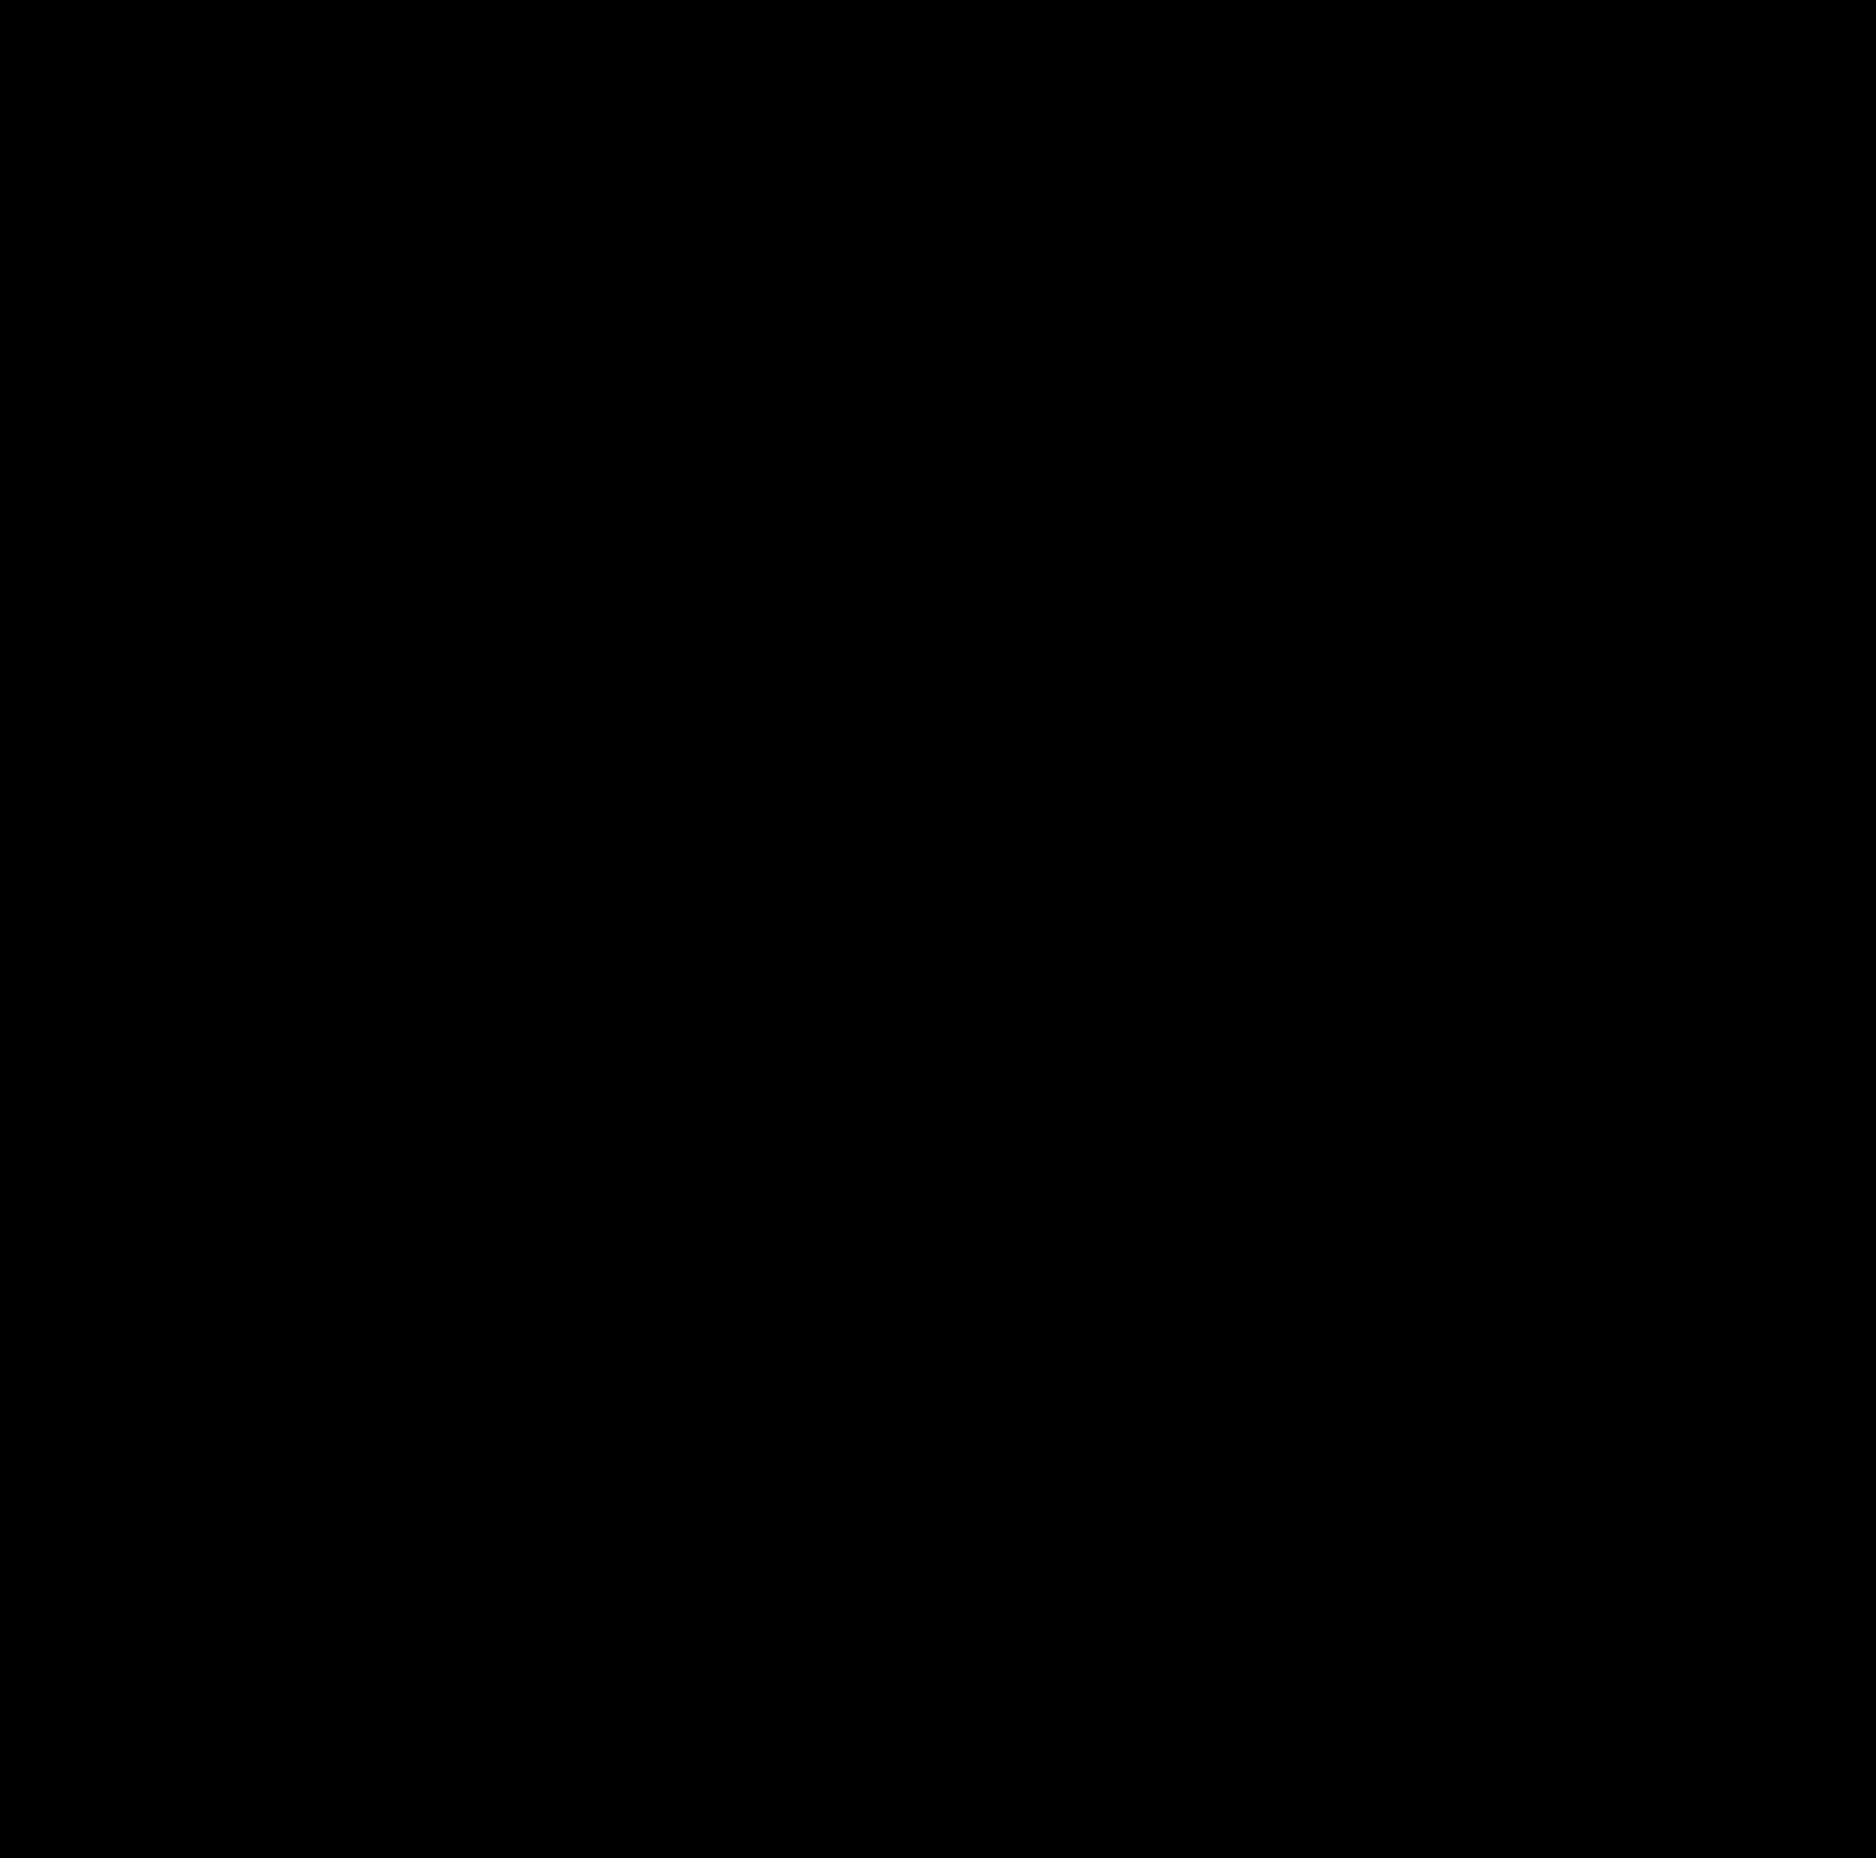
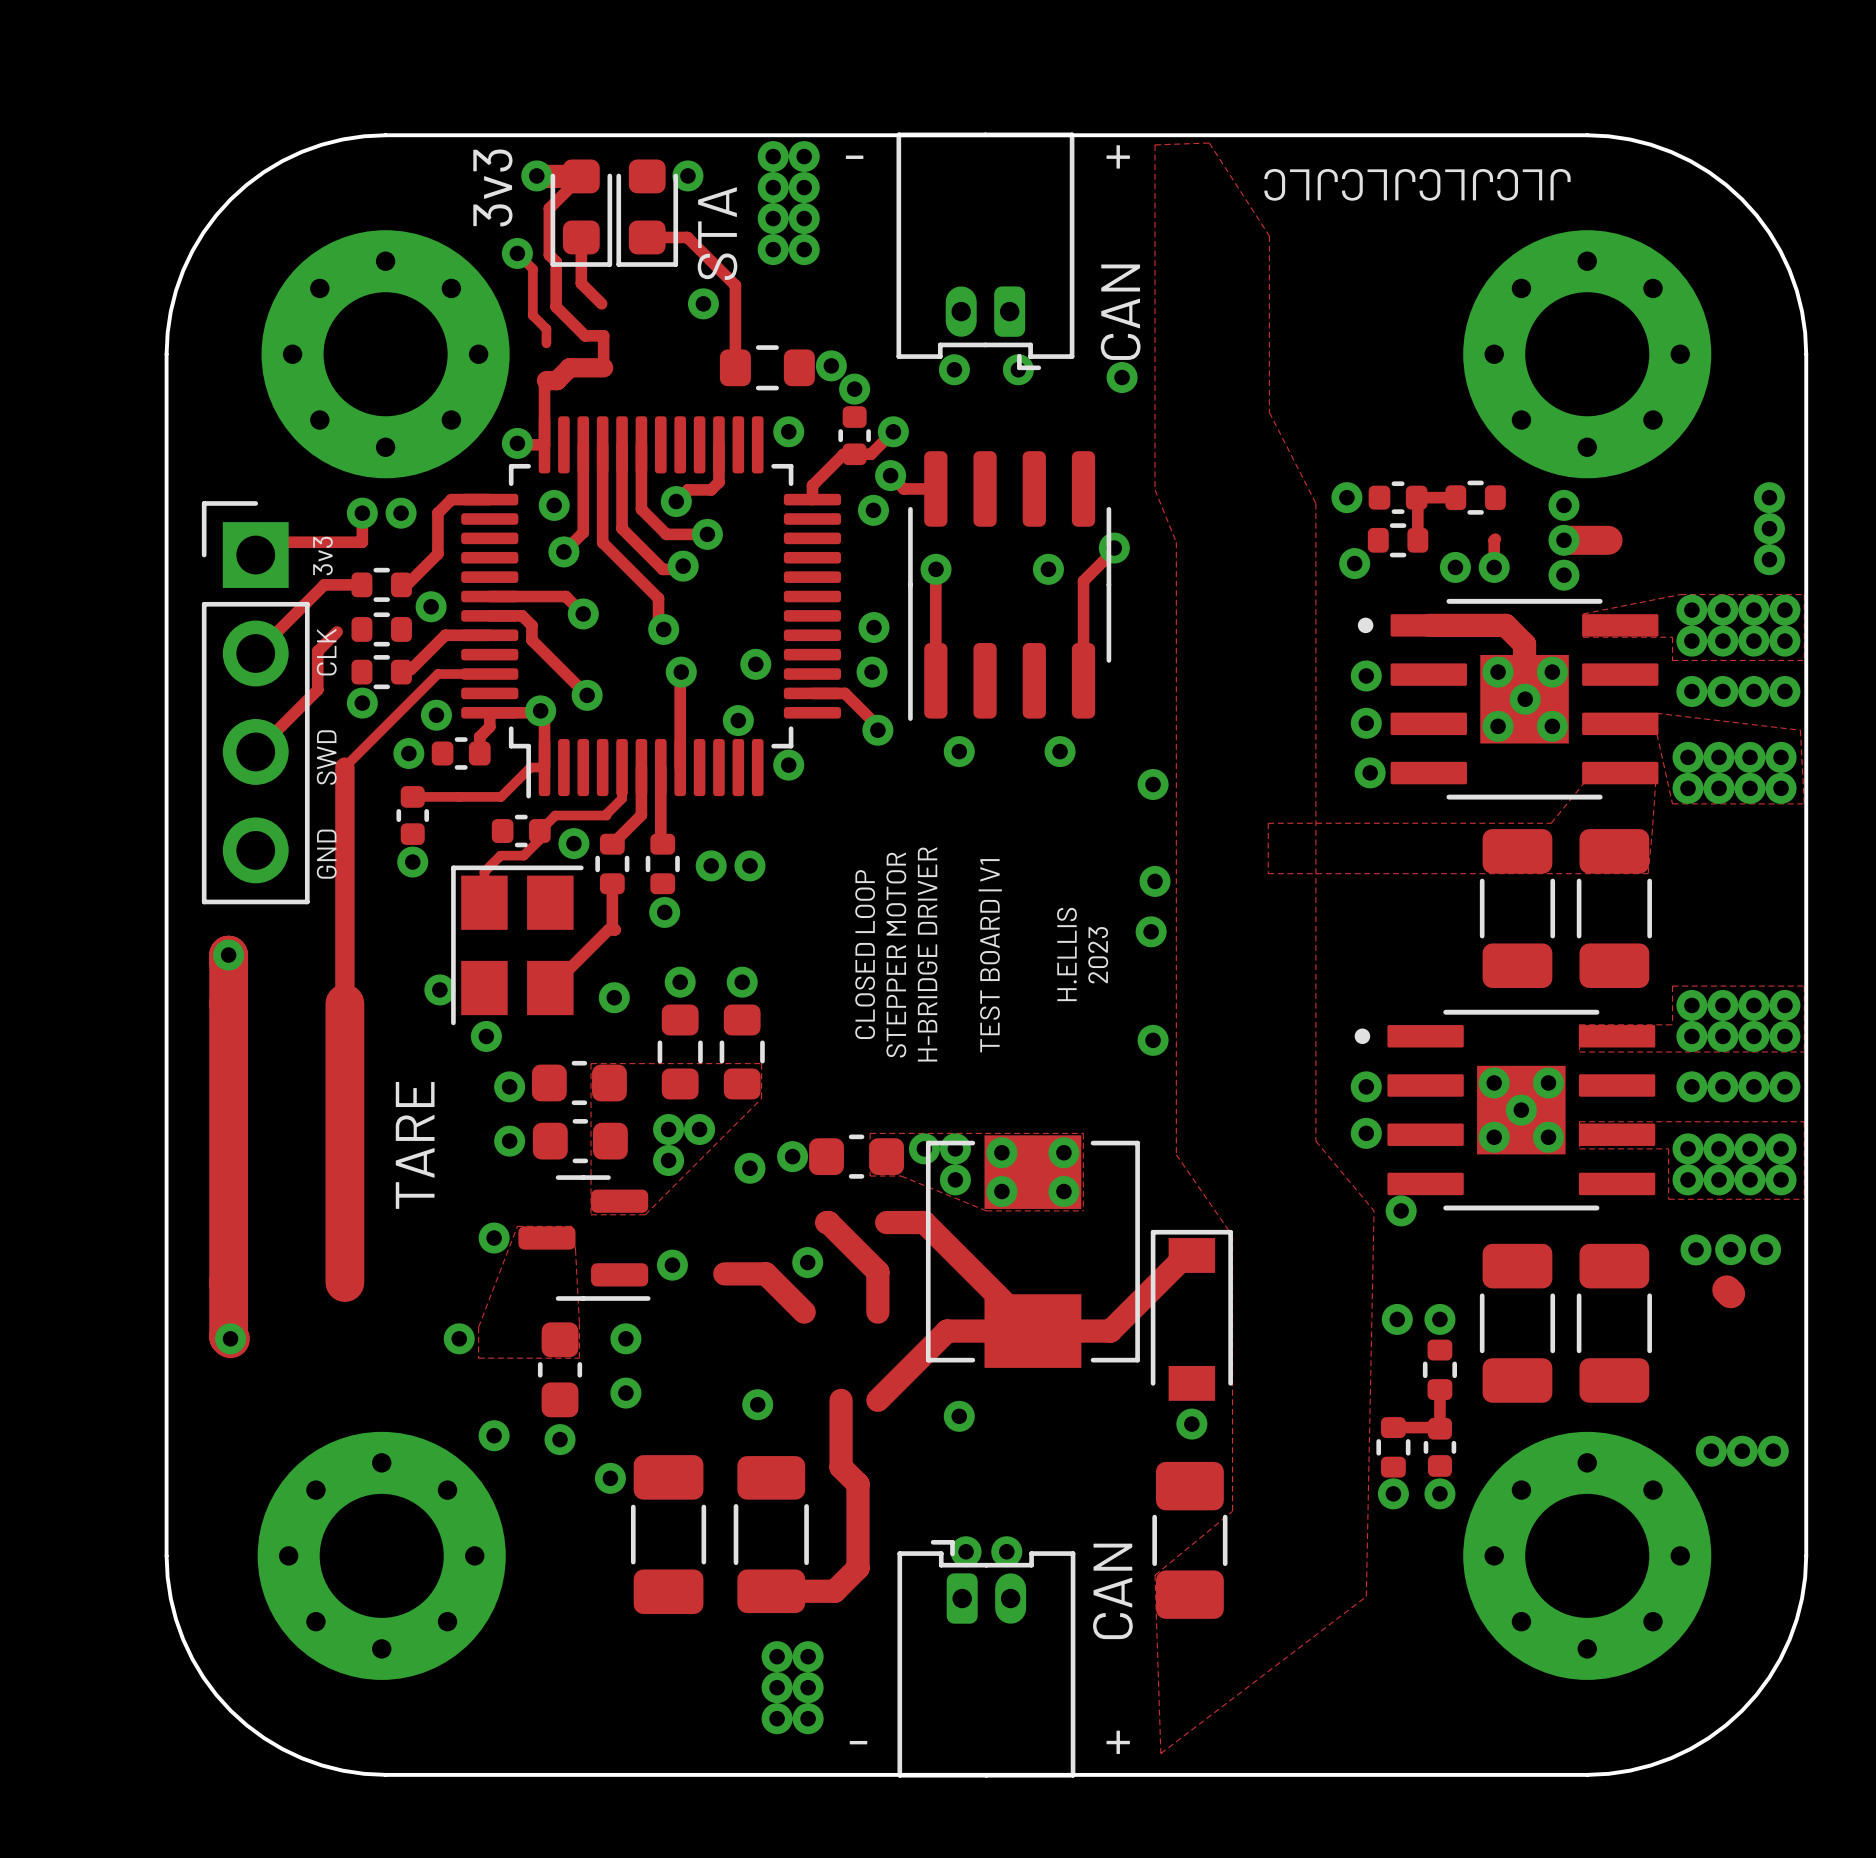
board edge: none -> (385, 135) (1608, 136) (1650, 144) (1690, 161) (1726, 184) (1756, 215) (1780, 251) (1796, 290) (1805, 332) (1806, 354) (1806, 1555) (1802, 1598) (1796, 1619) (1780, 1659) (1756, 1694) (1726, 1725) (1690, 1749) (1671, 1758) (1629, 1770) (1587, 1774) (385, 1774) (342, 1770) (301, 1758) (282, 1749) (246, 1725) (216, 1694) (192, 1659) (176, 1619) (167, 1577) (166, 1555) (167, 332) (176, 290) (192, 251) (216, 215) (230, 199) (263, 172) (301, 151) (342, 139) (385, 135)
zone outline: none -> (1209, 142) (1155, 144) (1155, 489) (1176, 542) (1176, 1154) (1232, 1236) (1232, 1511) (1155, 1575) (1160, 1753) (1366, 1596) (1374, 1210) (1315, 1141) (1315, 503) (1269, 412) (1269, 236) (1209, 142)
text: none -> + (1118, 156)
via: none -> (773, 156)
via: none -> (804, 156)
text: none -> - (854, 157)
via: none -> (536, 175)
via: none -> (687, 175)
track: none -> (537, 176) (581, 176) (549, 208) (549, 255) (556, 261) (556, 306) (585, 335) (603, 335) (603, 367) (569, 367) (556, 380) (546, 380) (544, 382) (544, 444) (517, 443)
text: none -> JLCJLCJLCJLC (1417, 184)
text: none -> 3v3 (492, 187)
via: none -> (773, 187)
via: none -> (804, 187)
part: none -> (581, 213)
part: none -> (647, 213)
via: none -> (773, 218)
via: none -> (804, 218)
text: none -> STA (717, 233)
track: none -> (581, 237) (581, 283) (601, 303)
track: none -> (647, 237) (687, 237) (735, 285) (735, 367)
via: none -> (773, 249)
via: none -> (804, 249)
part: none -> (985, 251)
track: none -> (517, 253) (532, 268) (532, 315) (546, 329) (546, 343)
via: none -> (517, 253)
via: none -> (703, 303)
text: none -> CAN (1120, 312)
part: none -> (385, 354)
part: none -> (1587, 354)
via: none -> (831, 365)
part: none -> (767, 367)
via: none -> (954, 369)
via: none -> (1018, 369)
via: none -> (1122, 377)
via: none -> (854, 389)
via: none -> (788, 431)
track: none -> (893, 431) (870, 454) (843, 454) (812, 485) (812, 499)
via: none -> (893, 431)
part: none -> (854, 435)
via: none -> (517, 443)
track: none -> (583, 444) (583, 532) (563, 551)
track: none -> (602, 444) (602, 542) (658, 598) (658, 624) (663, 629)
track: none -> (622, 444) (622, 528) (662, 569) (679, 569) (683, 566)
track: none -> (641, 444) (641, 509) (666, 534) (707, 534)
track: none -> (718, 444) (718, 482) (711, 489) (687, 489) (676, 501)
track: none -> (890, 475) (903, 488) (935, 488)
via: none -> (890, 475)
via: none -> (1346, 497)
part: none -> (1398, 497)
track: none -> (1455, 497) (1416, 497) (1417, 540)
part: none -> (1475, 497)
via: none -> (1769, 497)
track: none -> (489, 499) (451, 499) (437, 513) (437, 553) (406, 584) (401, 584)
via: none -> (676, 501)
via: none -> (554, 505)
via: none -> (1563, 505)
via: none -> (873, 510)
track: none -> (362, 513) (362, 542) (268, 542) (255, 555)
via: none -> (362, 513)
via: none -> (401, 513)
via: none -> (1769, 528)
via: none -> (707, 534)
track: none -> (1495, 539) (1494, 567)
part: none -> (1398, 540)
track: none -> (1563, 540) (1608, 540)
via: none -> (1563, 540)
track: none -> (1114, 548) (1083, 581) (1083, 680)
via: none -> (1114, 548)
via: none -> (563, 551)
text: none -> 3v3 (322, 556)
via: none -> (1769, 559)
via: none -> (1354, 563)
via: none -> (683, 566)
via: none -> (1455, 567)
via: none -> (1494, 567)
track: none -> (935, 569) (935, 680)
via: none -> (936, 569)
via: none -> (1048, 569)
via: none -> (1563, 575)
track: none -> (350, 584) (324, 584) (255, 653)
part: none -> (381, 584)
part: none -> (1009, 586)
zone outline: none -> (1680, 594) (1583, 613) (1583, 637) (1672, 637) (1672, 660) (1804, 660) (1804, 594) (1680, 594)
track: none -> (489, 596) (565, 596) (583, 613)
via: none -> (431, 606)
part: none -> (651, 607)
via: none -> (1691, 610)
via: none -> (1722, 610)
via: none -> (1753, 610)
via: none -> (1784, 610)
via: none -> (583, 613)
track: none -> (489, 615) (522, 615) (531, 625) (531, 640) (587, 695)
track: none -> (1428, 625) (1505, 625) (1524, 644) (1524, 699)
via: none -> (874, 627)
part: none -> (381, 629)
via: none -> (663, 629)
track: none -> (337, 631) (317, 651) (317, 689) (255, 751)
track: none -> (489, 635) (445, 635) (410, 669)
via: none -> (1691, 641)
via: none -> (1722, 641)
via: none -> (1753, 641)
via: none -> (1784, 641)
text: none -> CLK (326, 652)
via: none -> (755, 664)
part: none -> (381, 672)
track: none -> (681, 672) (680, 767)
via: none -> (681, 672)
via: none -> (872, 672)
via: none -> (1498, 672)
via: none -> (1552, 672)
track: none -> (489, 674) (437, 674) (344, 767) (344, 1282)
via: none -> (1366, 675)
via: none -> (1691, 691)
via: none -> (1722, 691)
via: none -> (1753, 691)
via: none -> (1784, 691)
track: none -> (812, 693) (844, 693) (877, 726) (877, 730)
via: none -> (587, 695)
part: none -> (1508, 699)
via: none -> (1525, 699)
part: none -> (255, 702)
via: none -> (362, 703)
via: none -> (540, 710)
zone outline: none -> (1656, 713) (1583, 734) (1657, 734) (1672, 803) (1804, 803) (1800, 730) (1656, 713)
via: none -> (436, 715)
via: none -> (738, 720)
via: none -> (1366, 723)
via: none -> (1498, 726)
via: none -> (1552, 726)
via: none -> (877, 730)
via: none -> (959, 751)
via: none -> (1060, 751)
via: none -> (408, 753)
part: none -> (461, 753)
track: none -> (479, 753) (479, 736) (489, 726) (489, 712) (538, 712) (540, 710) (544, 714) (544, 767) (530, 767) (501, 796) (412, 796)
text: none -> SWD (326, 757)
via: none -> (1688, 757)
via: none -> (1719, 757)
via: none -> (1750, 757)
via: none -> (1781, 757)
via: none -> (788, 765)
zone outline: none -> (1586, 765) (1586, 780) (1551, 823) (1268, 823) (1268, 873) (1648, 873) (1655, 765) (1586, 765)
track: none -> (622, 767) (622, 798) (606, 815) (555, 815) (539, 831) (539, 839) (523, 855) (500, 855) (484, 871) (484, 902) (484, 898)
track: none -> (641, 767) (641, 815) (612, 844)
track: none -> (660, 767) (660, 842) (662, 844)
via: none -> (1370, 772)
via: none -> (1153, 784)
via: none -> (1688, 788)
via: none -> (1719, 788)
via: none -> (1750, 788)
via: none -> (1781, 788)
part: none -> (412, 815)
part: none -> (521, 831)
via: none -> (573, 843)
text: none -> GND (326, 854)
via: none -> (412, 862)
part: none -> (612, 863)
part: none -> (662, 863)
via: none -> (711, 865)
via: none -> (749, 865)
via: none -> (1155, 881)
track: none -> (612, 883) (612, 927) (615, 929) (608, 929) (550, 988)
part: none -> (1517, 908)
part: none -> (1614, 908)
via: none -> (664, 912)
via: none -> (1151, 931)
part: none -> (517, 945)
text: none -> H-BRIDGE DRIVER (927, 954)
text: none -> H.ELLIS (1067, 954)
text: none -> 2023 (1098, 955)
track: none -> (228, 955) (228, 1336) (230, 1338)
via: none -> (228, 955)
text: none -> CLOSED LOOP (865, 954)
text: none -> STEPPER MOTOR (896, 955)
text: none -> TEST BOARD | V1 (990, 955)
via: none -> (680, 982)
via: none -> (742, 982)
zone outline: none -> (1672, 986) (1672, 1024) (1579, 1024) (1579, 1051) (1804, 1051) (1804, 986) (1672, 986)
via: none -> (439, 989)
via: none -> (614, 997)
via: none -> (1691, 1005)
via: none -> (1722, 1005)
via: none -> (1753, 1005)
via: none -> (1784, 1005)
via: none -> (486, 1036)
via: none -> (1691, 1036)
via: none -> (1722, 1036)
via: none -> (1753, 1036)
via: none -> (1784, 1036)
via: none -> (1153, 1040)
part: none -> (680, 1051)
part: none -> (742, 1051)
zone outline: none -> (591, 1063) (591, 1214) (645, 1214) (761, 1098) (761, 1063) (591, 1063)
part: none -> (579, 1082)
via: none -> (1494, 1082)
via: none -> (1548, 1082)
via: none -> (509, 1086)
via: none -> (1366, 1086)
via: none -> (1691, 1086)
via: none -> (1722, 1086)
via: none -> (1753, 1086)
via: none -> (1784, 1086)
part: none -> (1504, 1110)
via: none -> (1521, 1110)
zone outline: none -> (1579, 1121) (1579, 1148) (1668, 1148) (1668, 1199) (1804, 1199) (1804, 1121) (1579, 1121)
via: none -> (668, 1129)
via: none -> (699, 1129)
zone outline: none -> (870, 1133) (870, 1176) (901, 1176) (986, 1210) (1083, 1210) (1083, 1133) (870, 1133)
via: none -> (1366, 1133)
via: none -> (1494, 1137)
via: none -> (1548, 1137)
via: none -> (509, 1141)
part: none -> (580, 1141)
text: none -> TARE (415, 1145)
via: none -> (924, 1148)
via: none -> (955, 1148)
via: none -> (1688, 1148)
via: none -> (1719, 1148)
via: none -> (1750, 1148)
via: none -> (1781, 1148)
via: none -> (1001, 1152)
via: none -> (1063, 1152)
via: none -> (792, 1156)
part: none -> (856, 1156)
via: none -> (668, 1160)
via: none -> (749, 1168)
via: none -> (955, 1179)
via: none -> (1688, 1179)
via: none -> (1719, 1179)
via: none -> (1750, 1179)
via: none -> (1781, 1179)
via: none -> (1001, 1191)
via: none -> (1063, 1191)
via: none -> (1401, 1210)
track: none -> (826, 1222) (877, 1271) (877, 1312)
track: none -> (886, 1222) (924, 1222) (1032, 1331)
zone outline: none -> (517, 1226) (478, 1327) (478, 1358) (579, 1358) (575, 1249) (571, 1226) (517, 1226)
via: none -> (494, 1238)
part: none -> (584, 1238)
via: none -> (1696, 1249)
via: none -> (1730, 1249)
via: none -> (1765, 1249)
part: none -> (1032, 1251)
track: none -> (1191, 1255) (1186, 1255) (1110, 1331) (947, 1331) (877, 1400)
via: none -> (807, 1262)
via: none -> (672, 1265)
track: none -> (725, 1274) (765, 1273) (804, 1312)
track: none -> (1726, 1289) (1730, 1293)
part: none -> (1191, 1315)
via: none -> (1397, 1319)
via: none -> (1439, 1319)
part: none -> (1517, 1323)
part: none -> (1614, 1323)
via: none -> (230, 1338)
via: none -> (459, 1338)
via: none -> (625, 1338)
part: none -> (560, 1369)
part: none -> (1439, 1369)
track: none -> (1439, 1389) (1439, 1428) (1393, 1427)
via: none -> (625, 1393)
track: none -> (841, 1400) (841, 1467) (858, 1484) (858, 1568) (834, 1591) (771, 1591)
via: none -> (757, 1404)
via: none -> (959, 1416)
via: none -> (1191, 1424)
via: none -> (494, 1435)
via: none -> (560, 1439)
part: none -> (1393, 1447)
part: none -> (1439, 1447)
via: none -> (1711, 1451)
via: none -> (1742, 1451)
via: none -> (1773, 1451)
via: none -> (610, 1478)
via: none -> (1393, 1493)
via: none -> (1439, 1493)
part: none -> (668, 1534)
part: none -> (771, 1534)
part: none -> (1189, 1540)
via: none -> (966, 1551)
via: none -> (1006, 1551)
part: none -> (381, 1555)
part: none -> (1587, 1555)
text: none -> CAN (1112, 1591)
via: none -> (777, 1656)
via: none -> (808, 1656)
part: none -> (986, 1658)
via: none -> (777, 1687)
via: none -> (808, 1687)
via: none -> (777, 1718)
via: none -> (808, 1718)
text: none -> + (1118, 1742)
text: none -> - (858, 1742)

